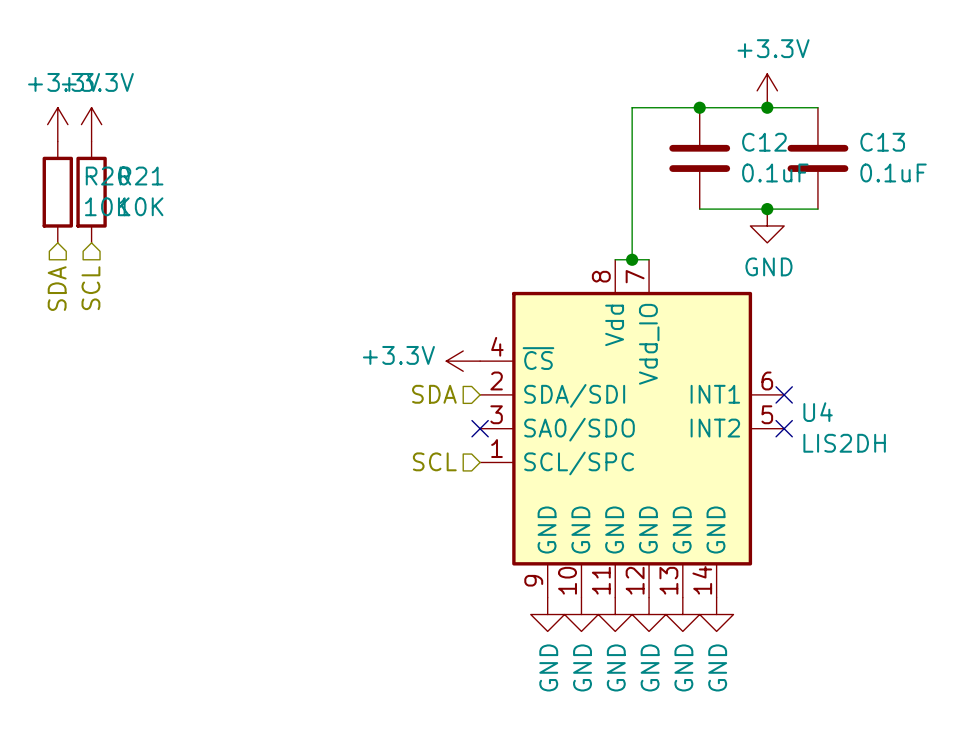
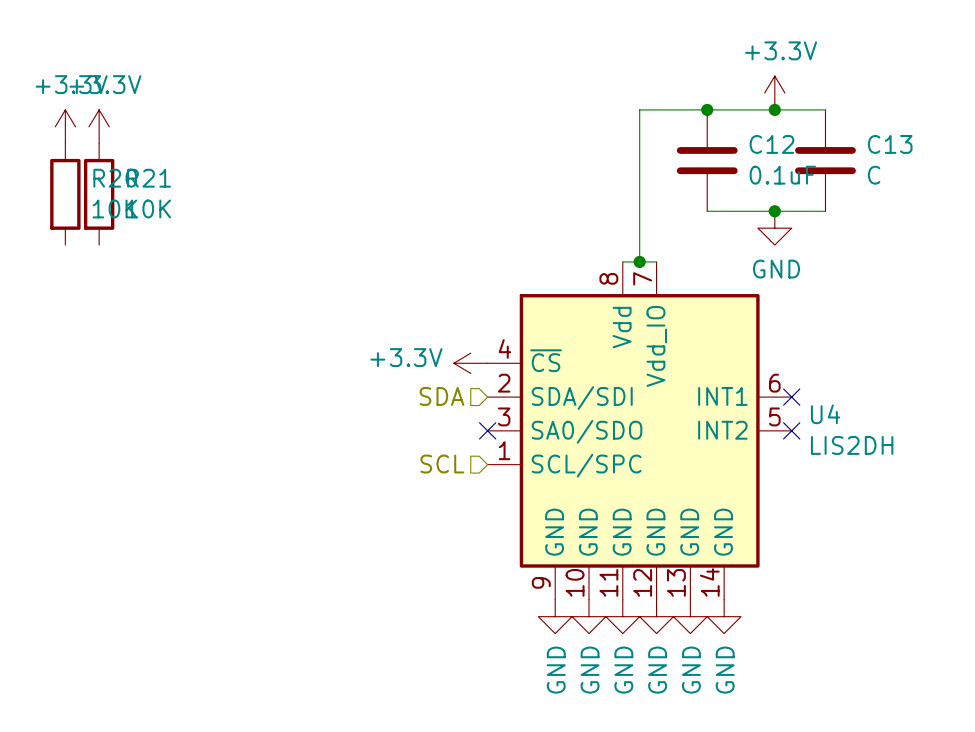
C13 value: 0.1uF (893, 172) -> C (874, 175)
hierarchical label: SDA (57, 288) -> none
hierarchical label: SCL (90, 288) -> none

